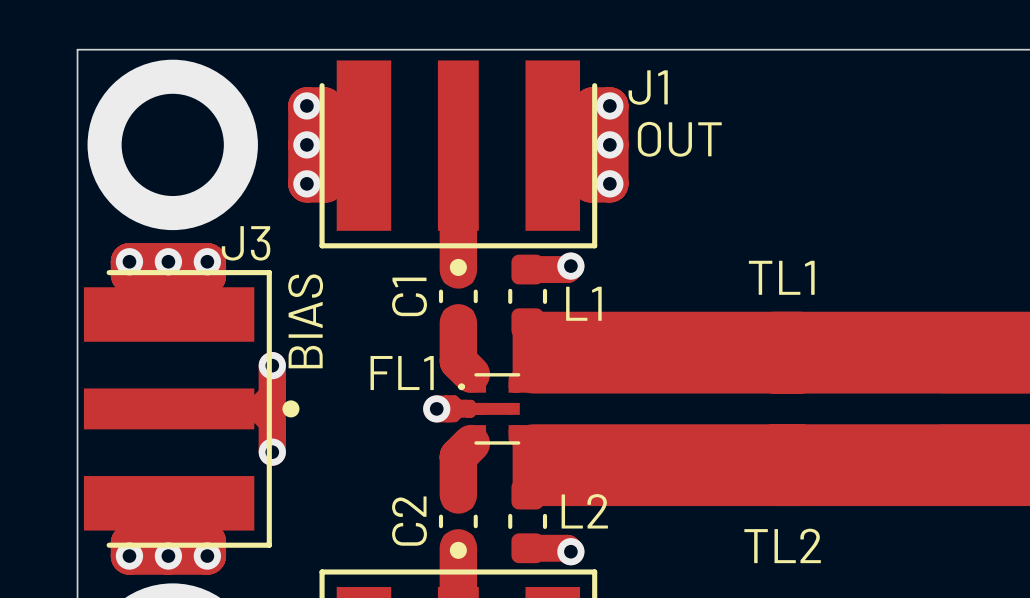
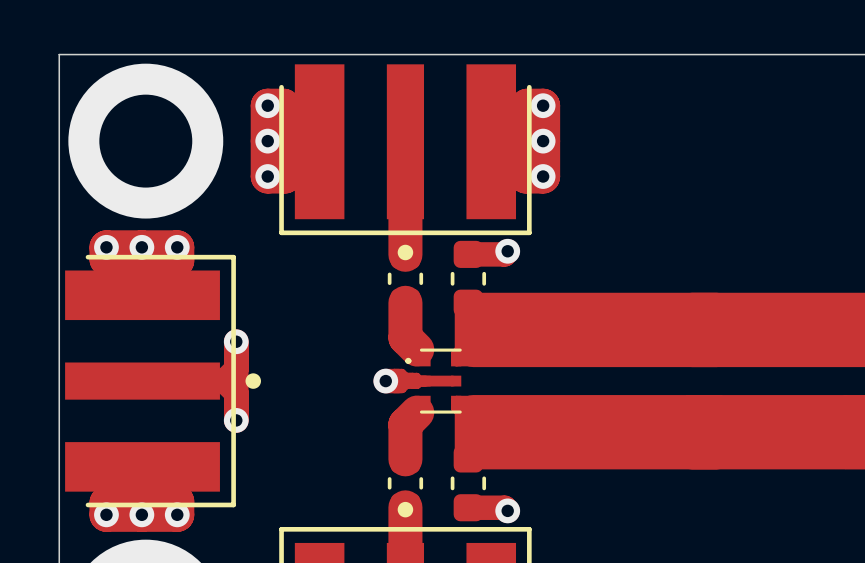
J1 name: J1 (648, 87) -> none
text: OUT (679, 139) -> none
J3 name: J3 (246, 243) -> none
TL1 name: TL1 (781, 277) -> none
C1 name: C1 (409, 296) -> none
L1 name: L1 (583, 303) -> none
text: BIAS (305, 321) -> none
FL1 name: FL1 (402, 373) -> none
L2 name: L2 (584, 511) -> none
C2 name: C2 (409, 521) -> none
TL2 name: TL2 (782, 545) -> none

